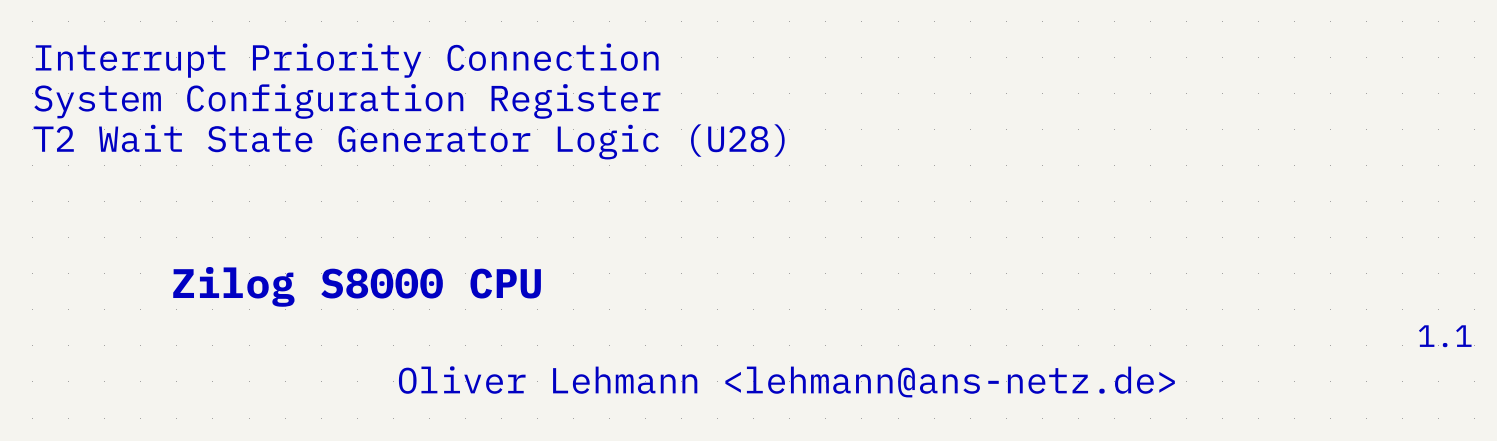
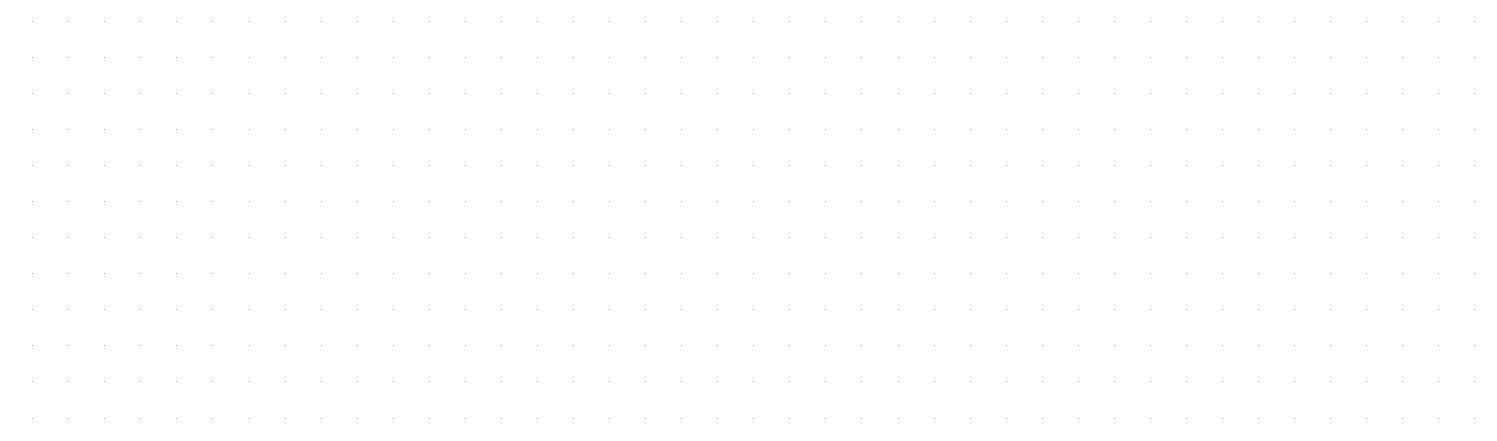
text: Interrupt Priority Connection (347, 60) -> none
text: System Configuration Register (347, 101) -> none
text: T2 Wait State Generator Logic (U28) (409, 141) -> none
text: Zilog S8000 CPU (357, 286) -> none
text: 1.1 (1445, 336) -> none
text: Oliver Lehmann <lehmann@ans-netz.de> (786, 381) -> none

